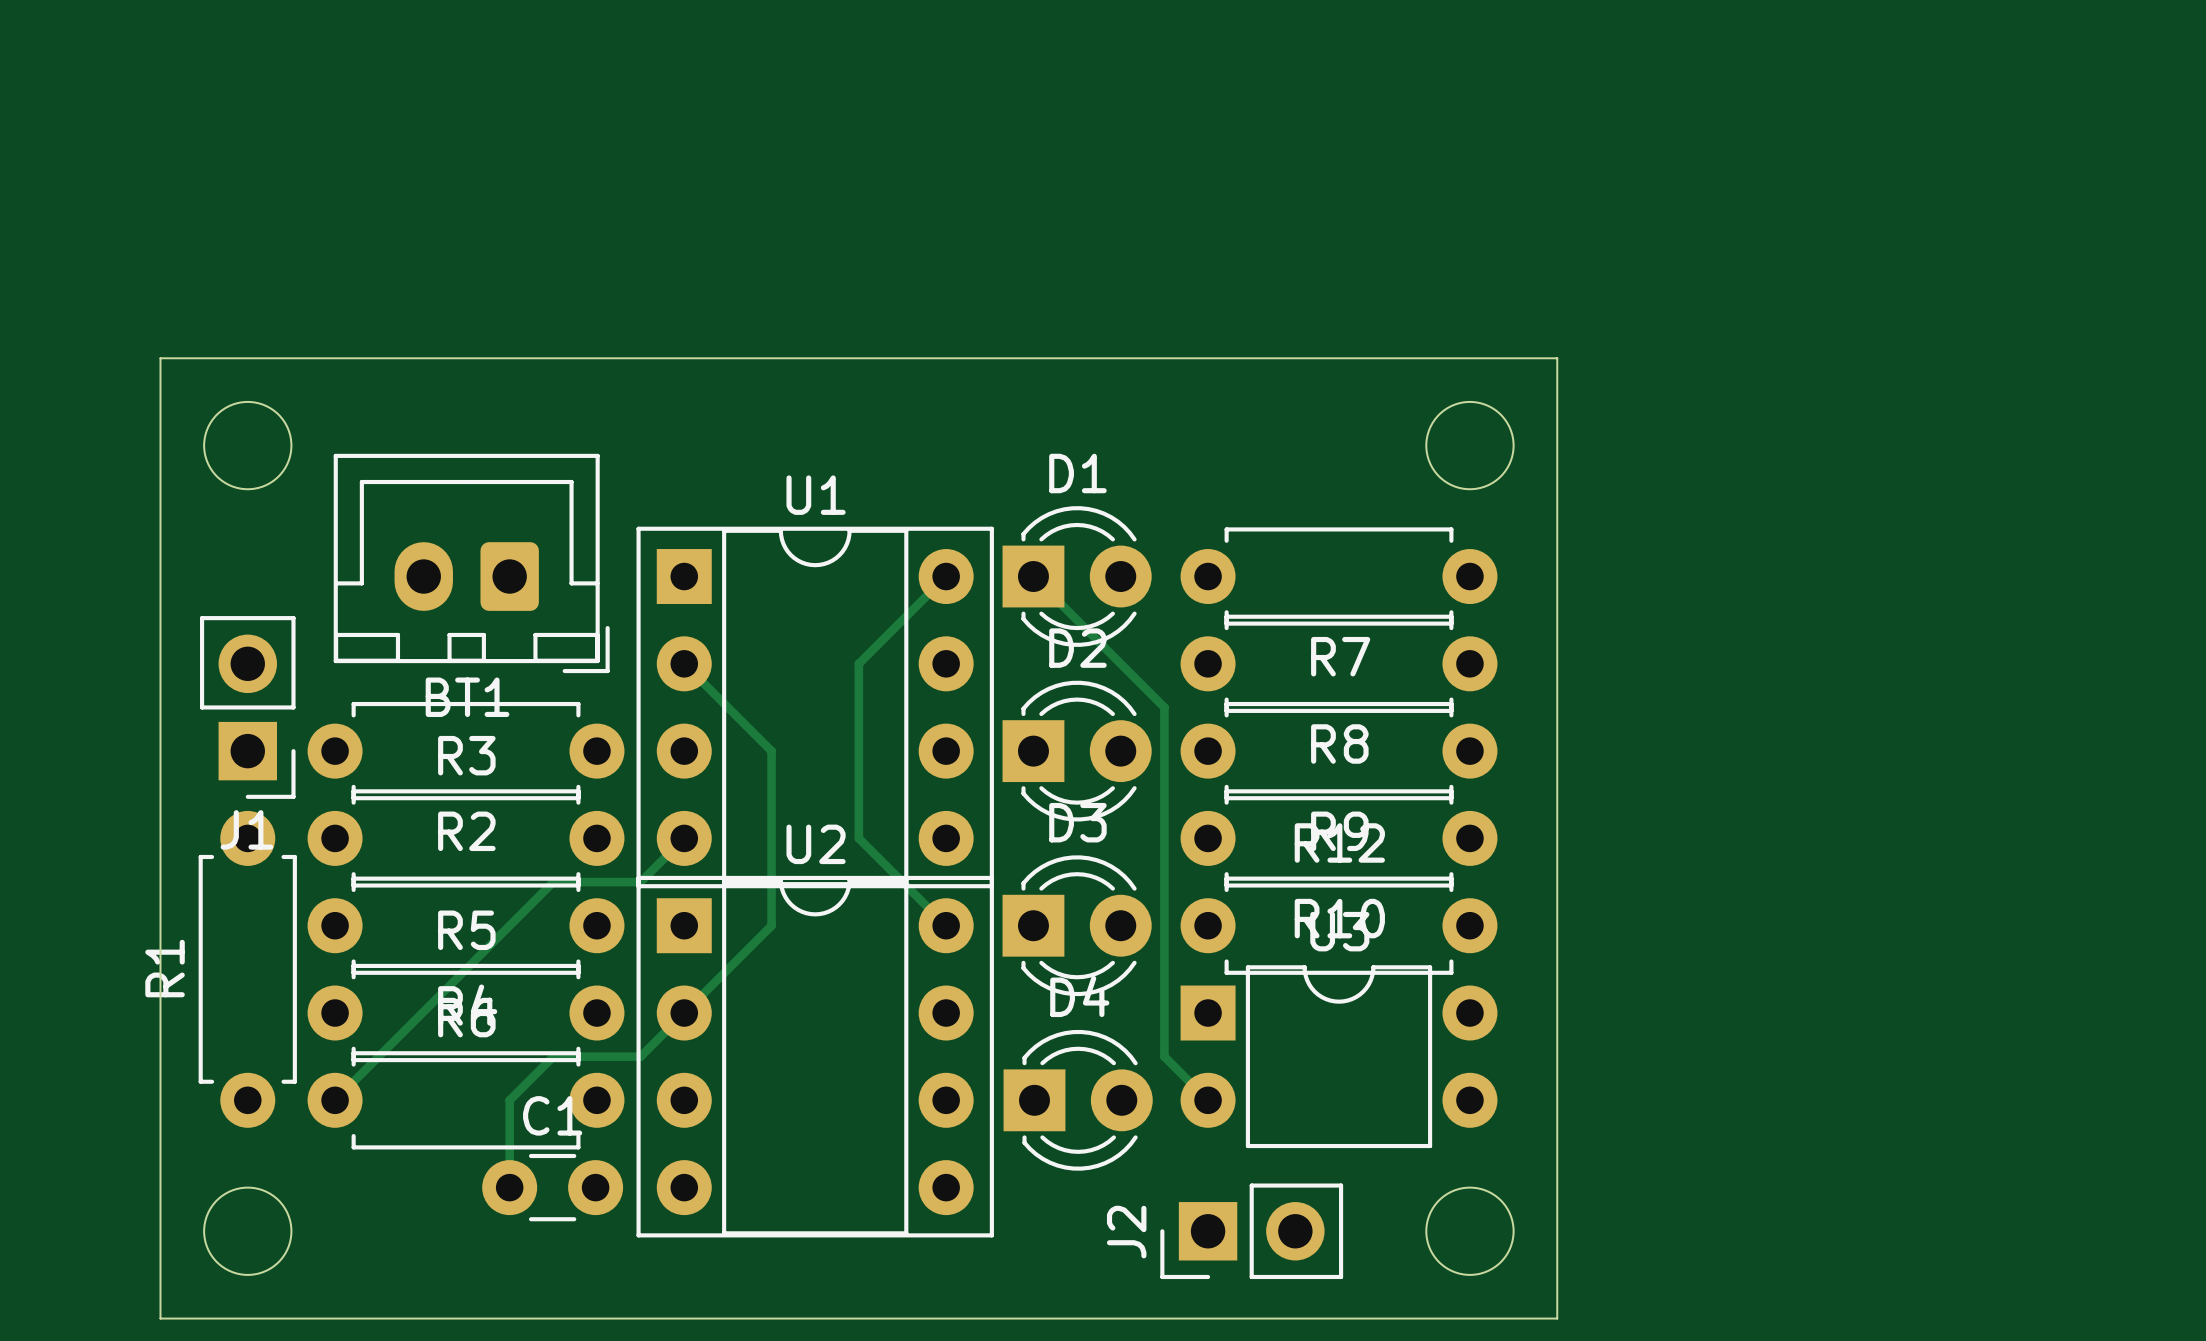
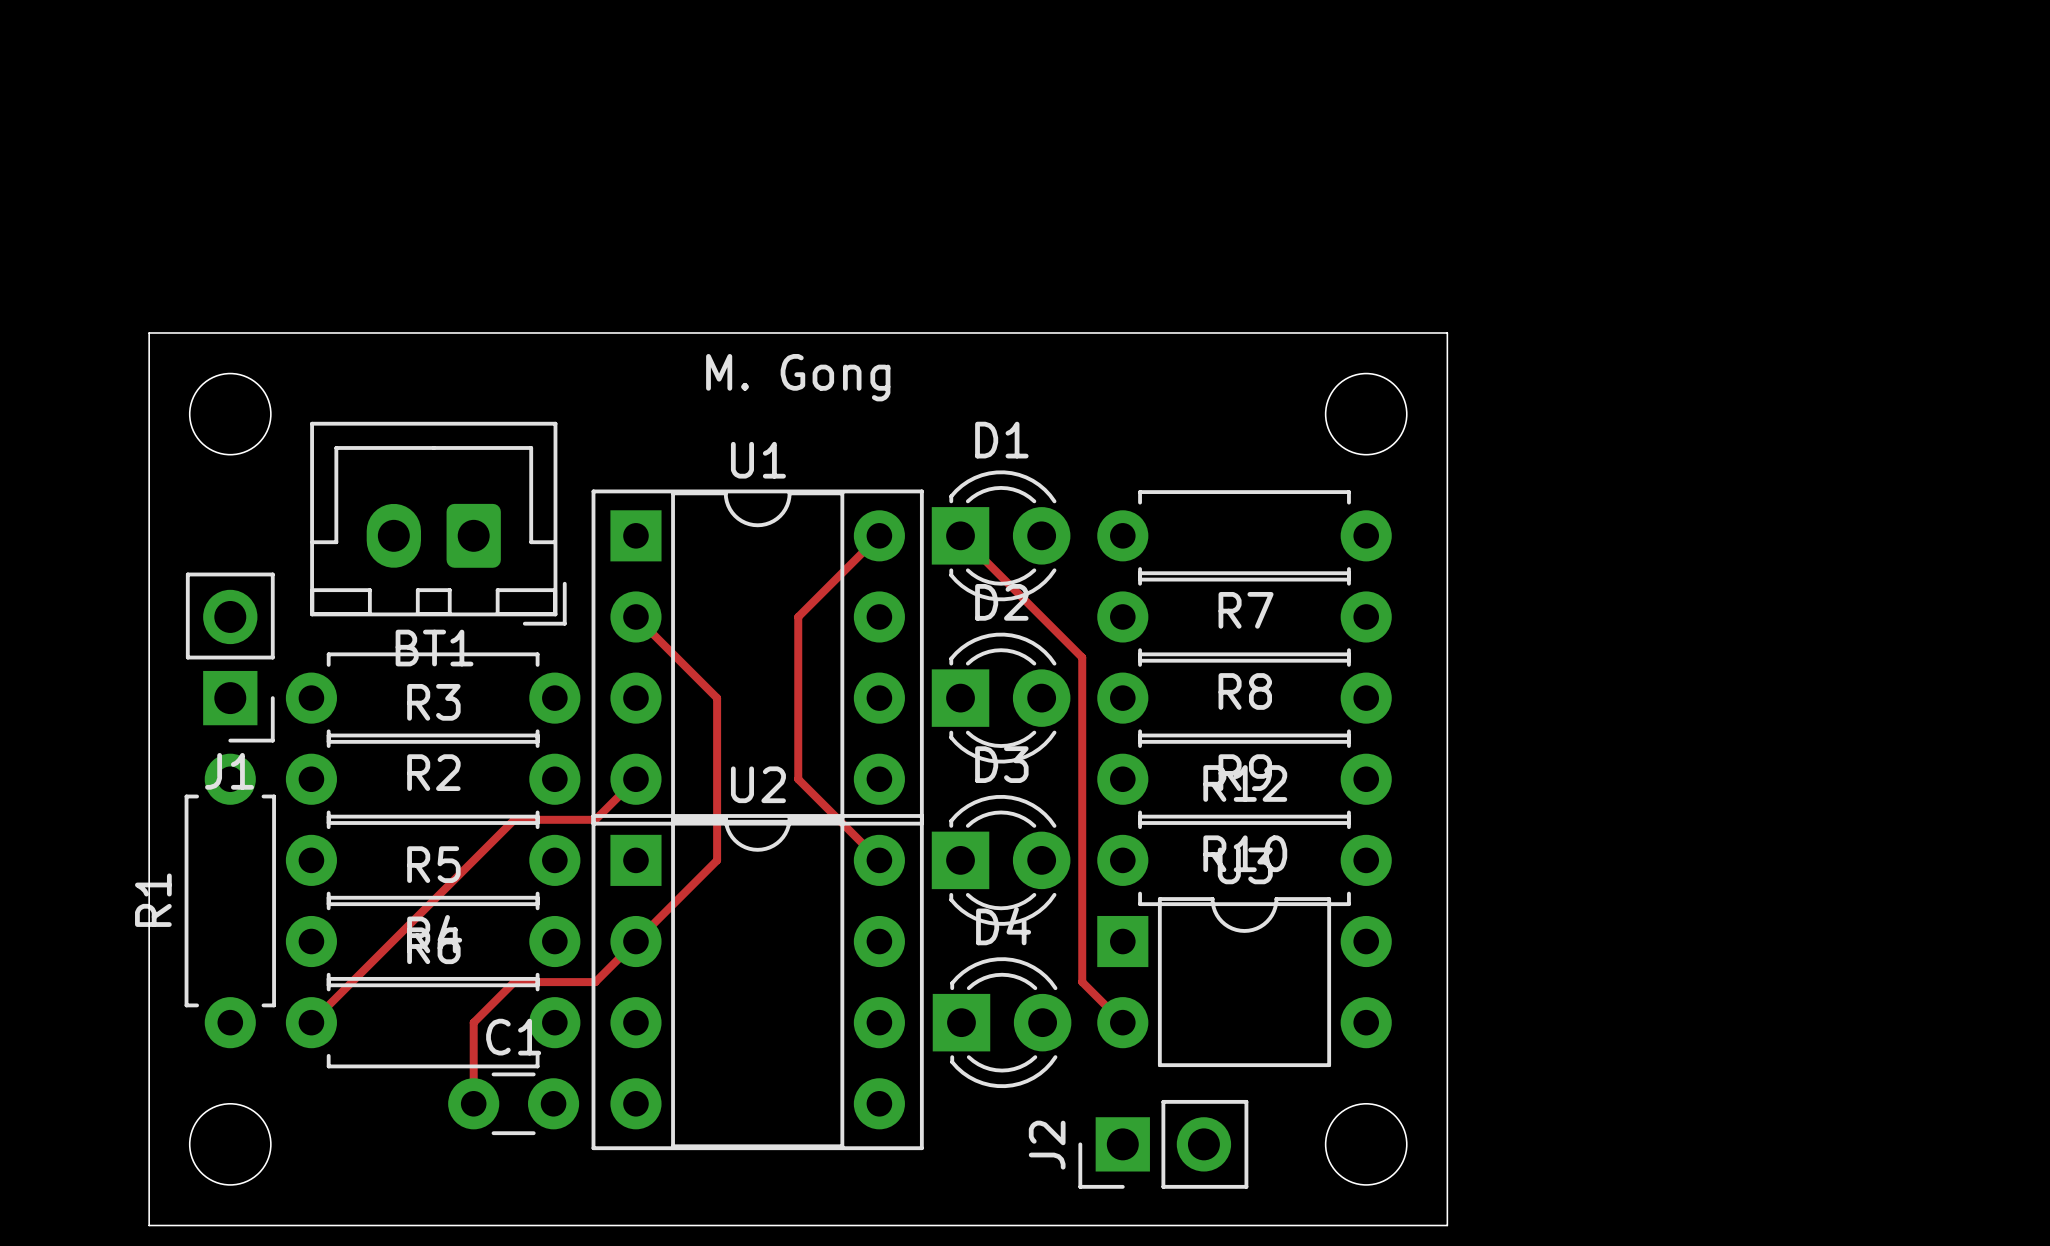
text: none -> M. Gong (798, 377)

